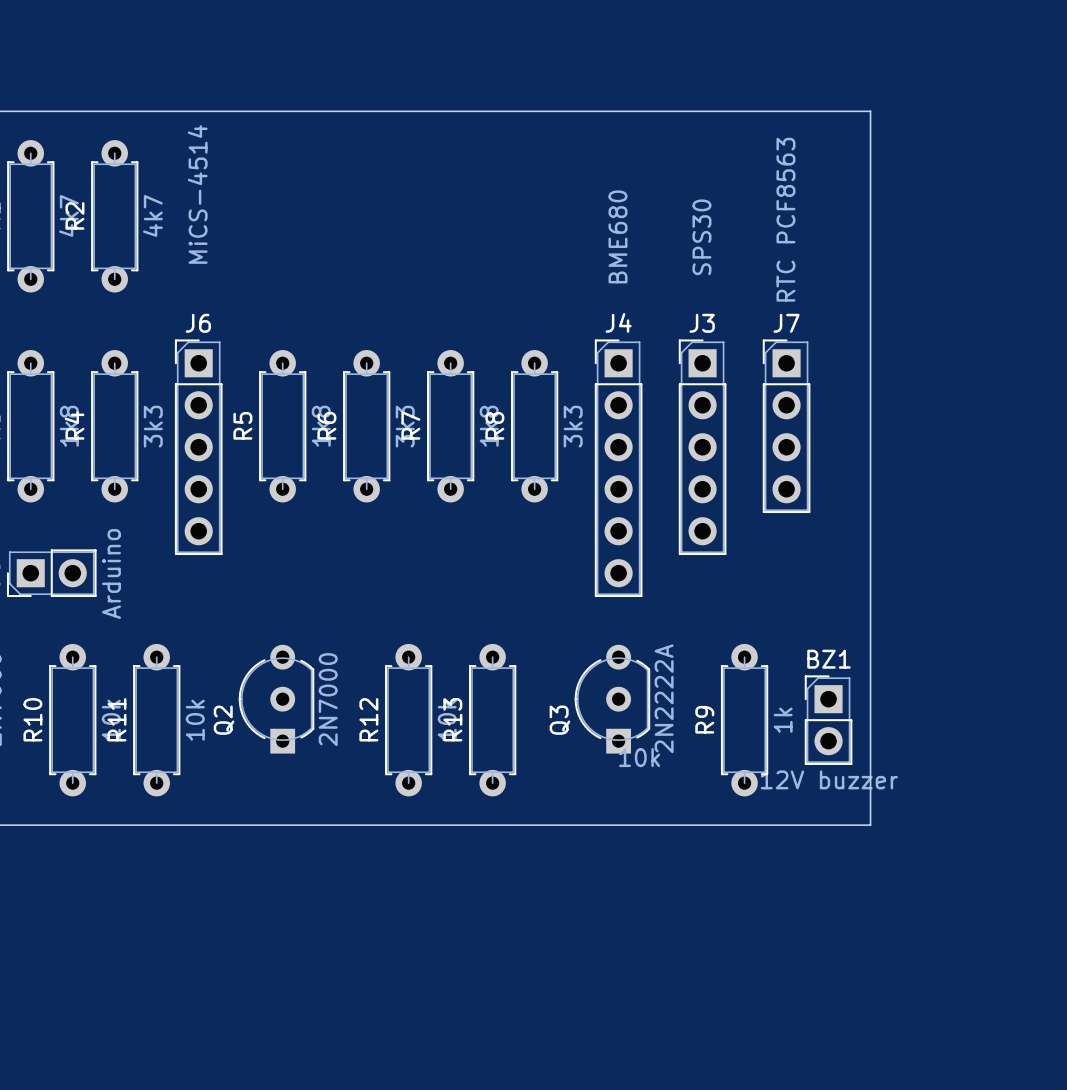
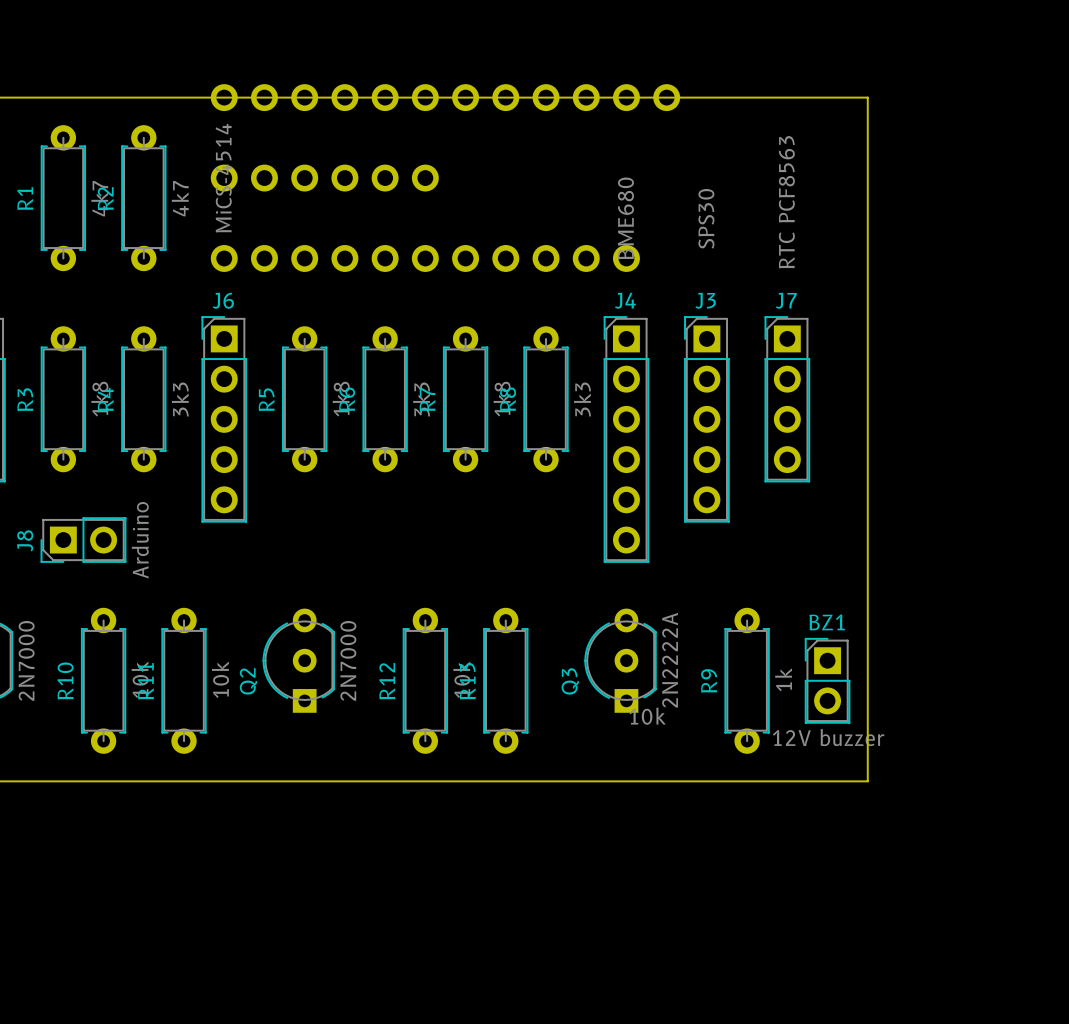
part: none -> (445, 97)
part: none -> (324, 178)
part: none -> (425, 258)

